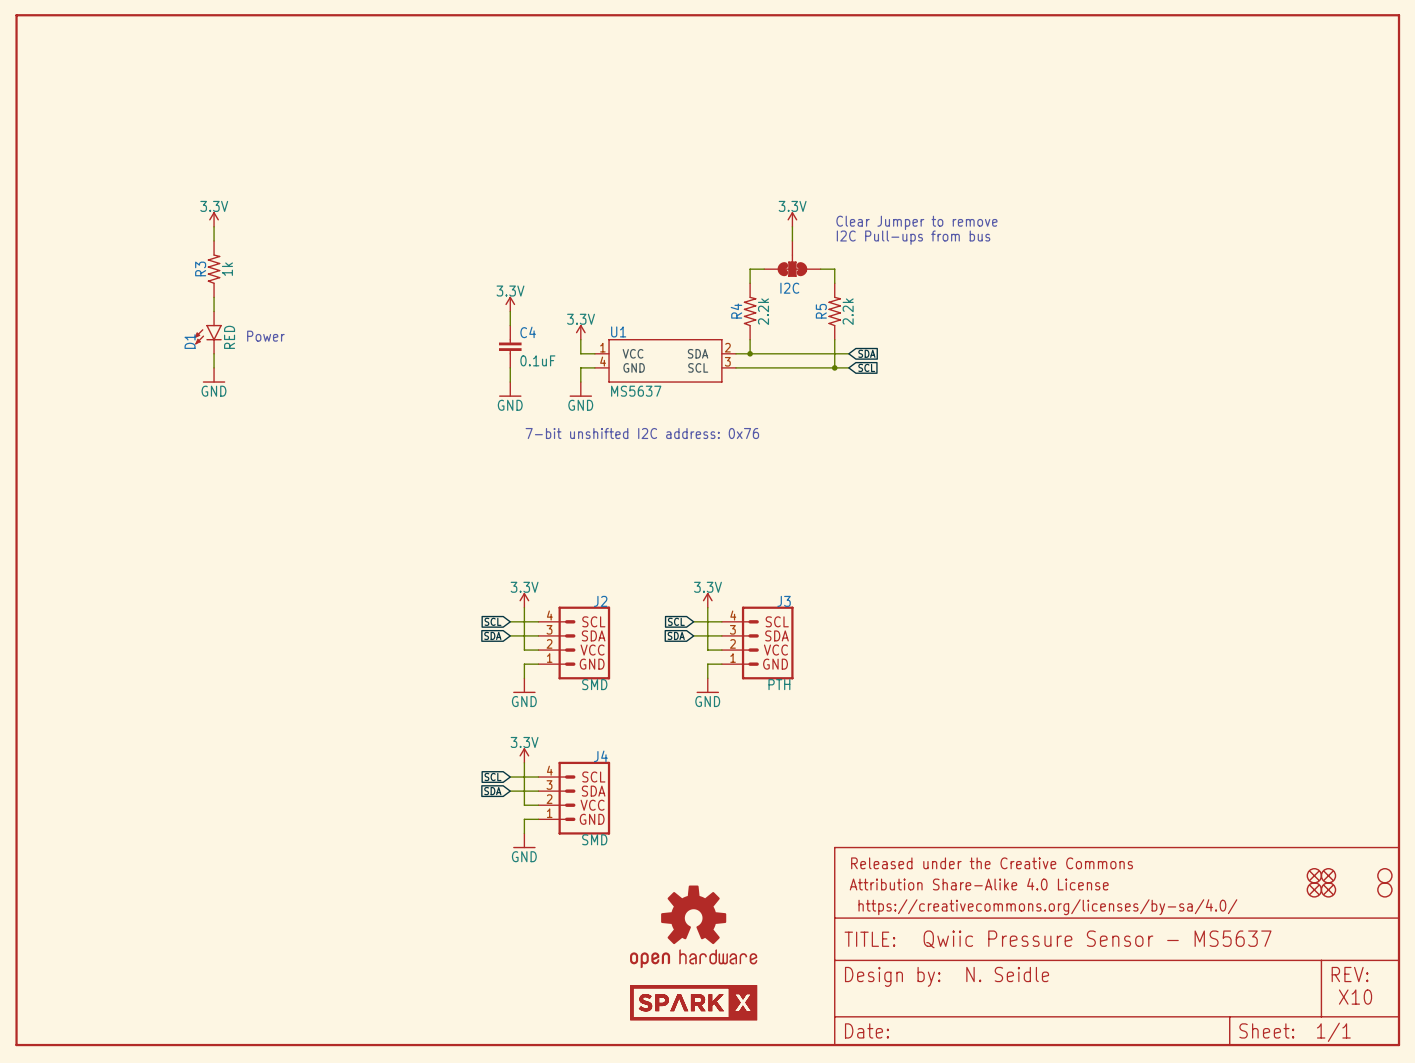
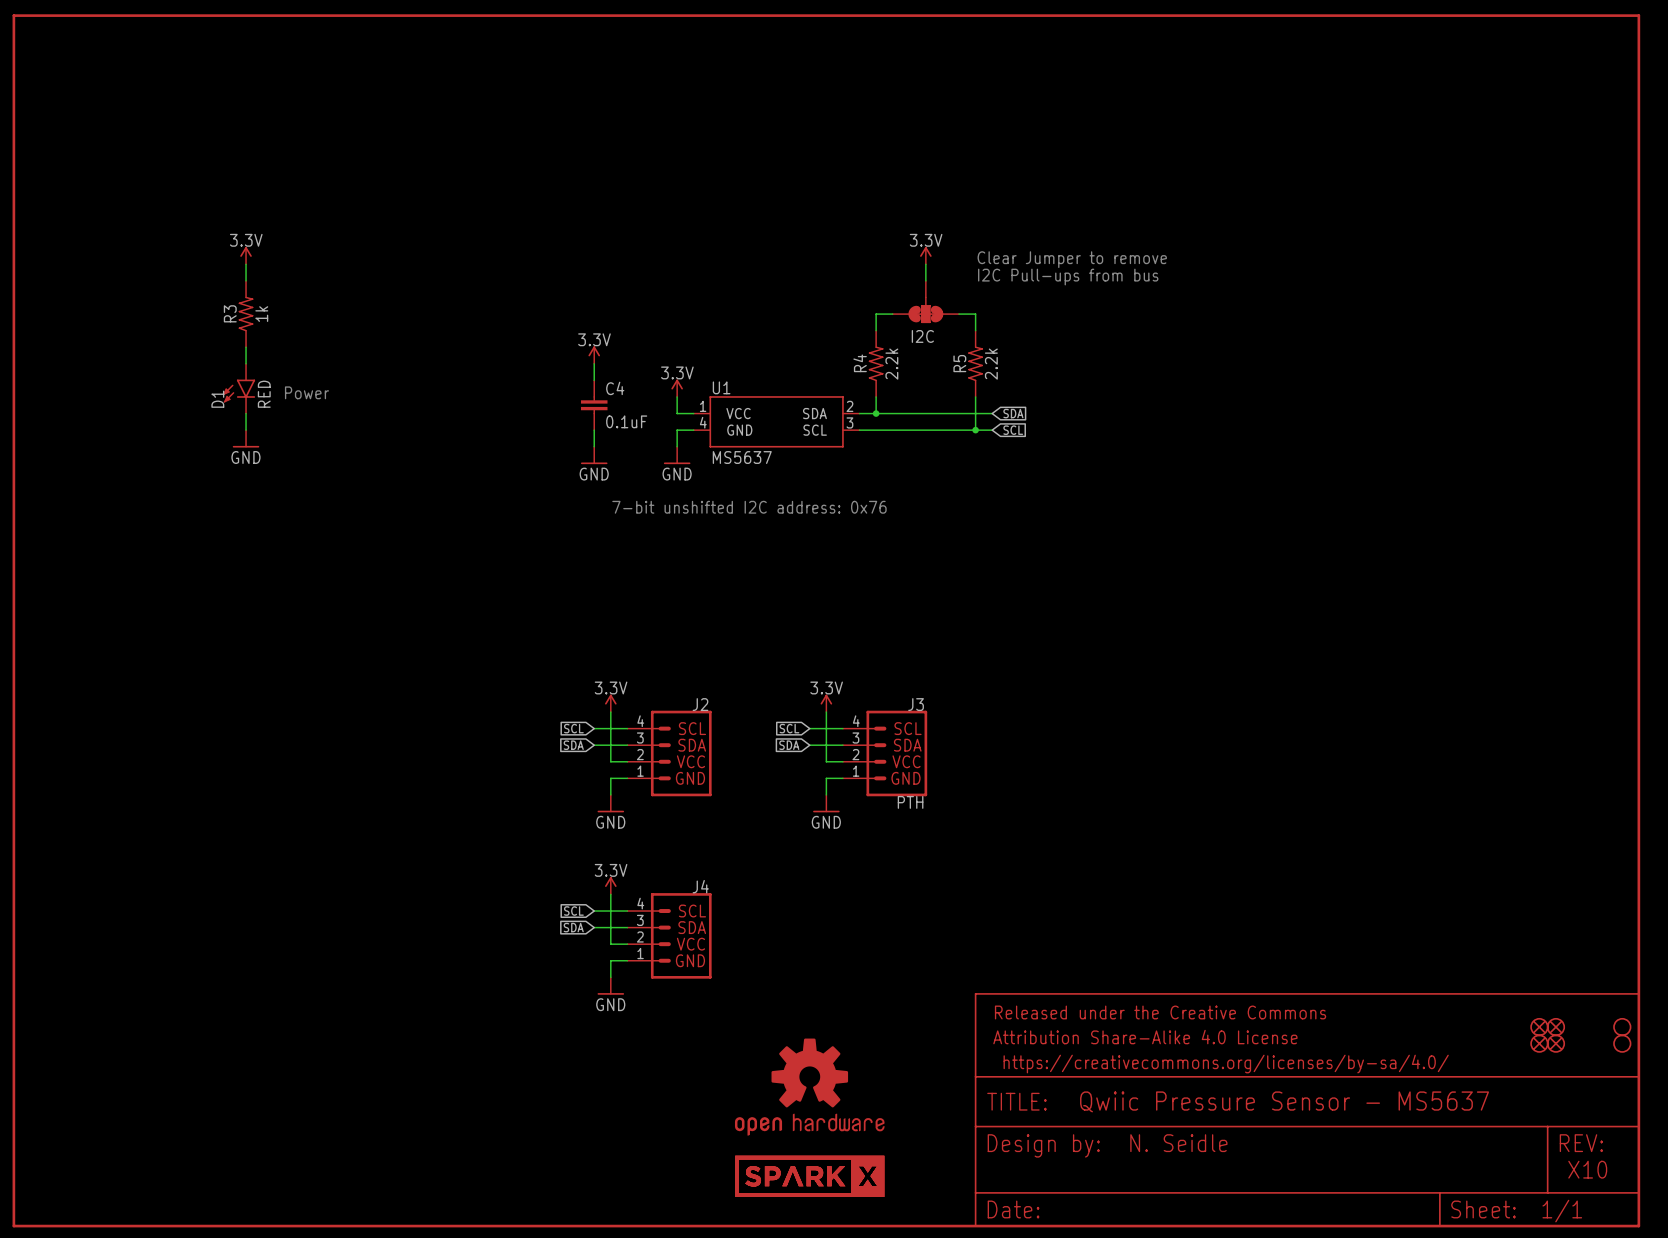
J2 value: SMD (594, 684) -> none
J4 value: SMD (594, 839) -> none

